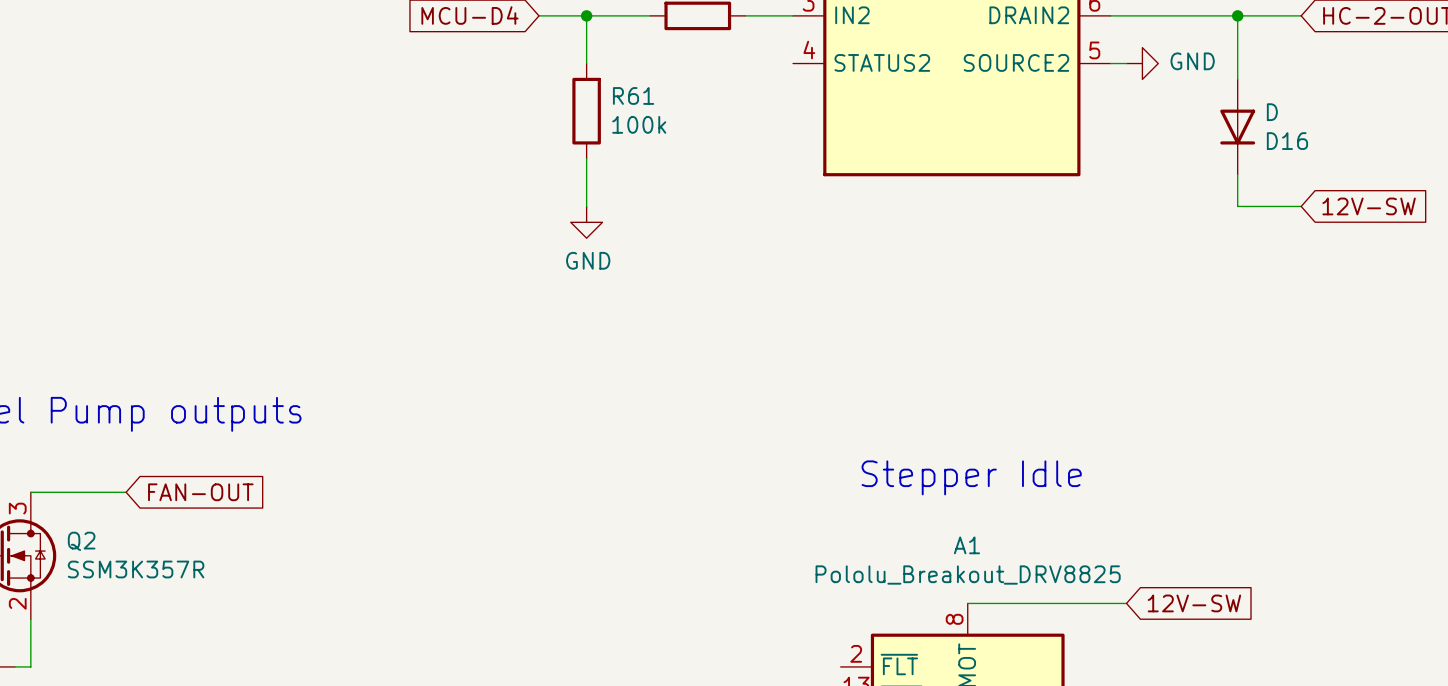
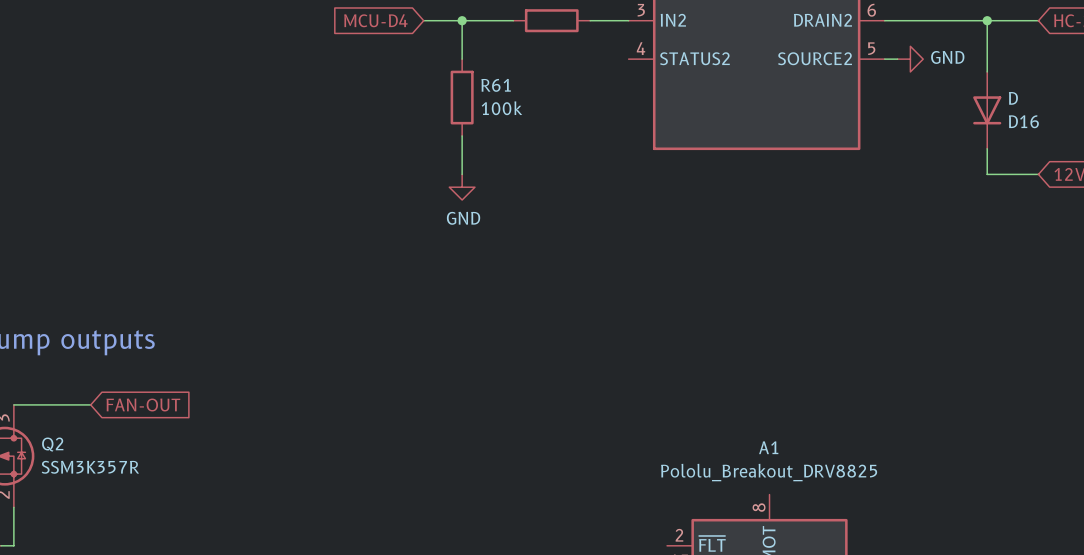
text: Stepper Idle (971, 477) -> none
wire: (967, 603) (1126, 603) -> none
global label: 12V-SW (1194, 603) -> none

